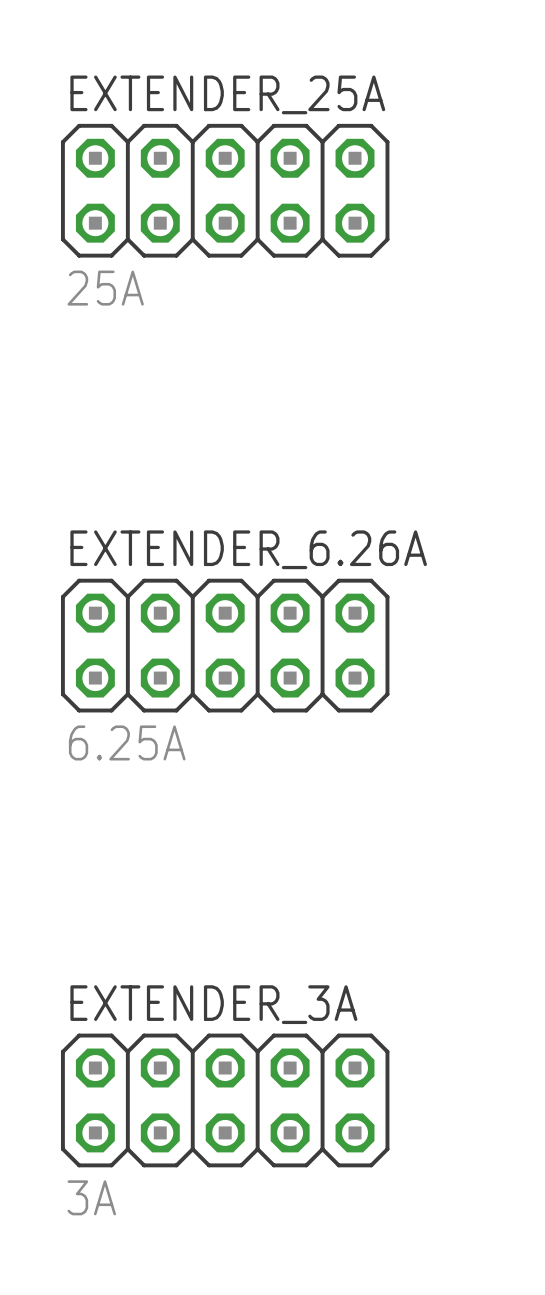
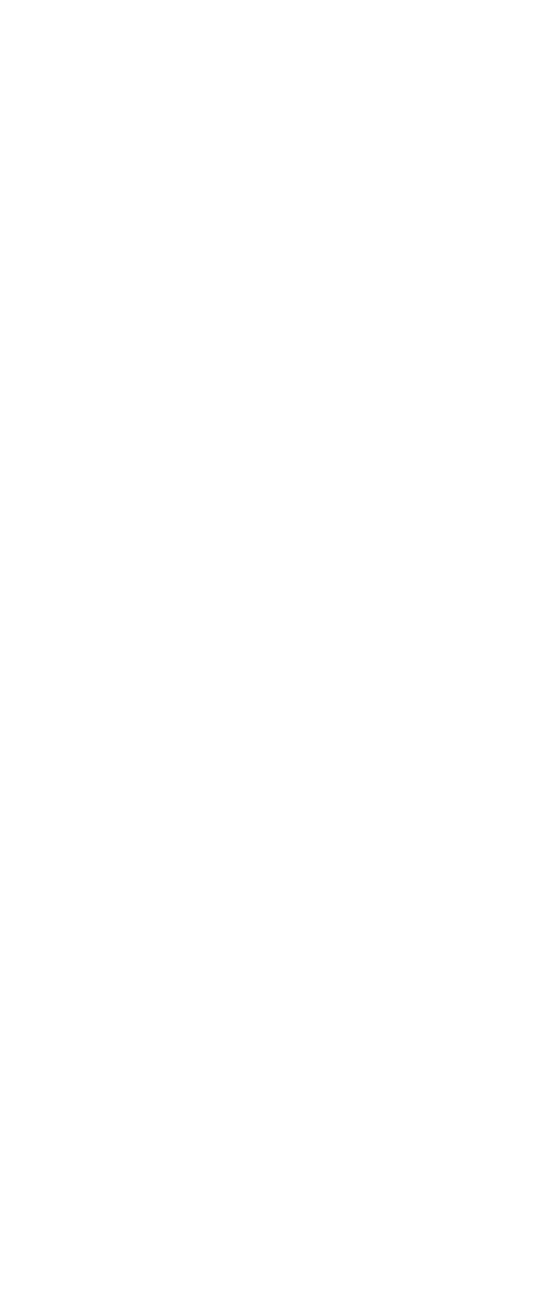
EXTENDER_25A: 25A (225, 190) -> none
EXTENDER_6.26A: 6.25A (225, 645) -> none
EXTENDER_3A: 3A (225, 1100) -> none

